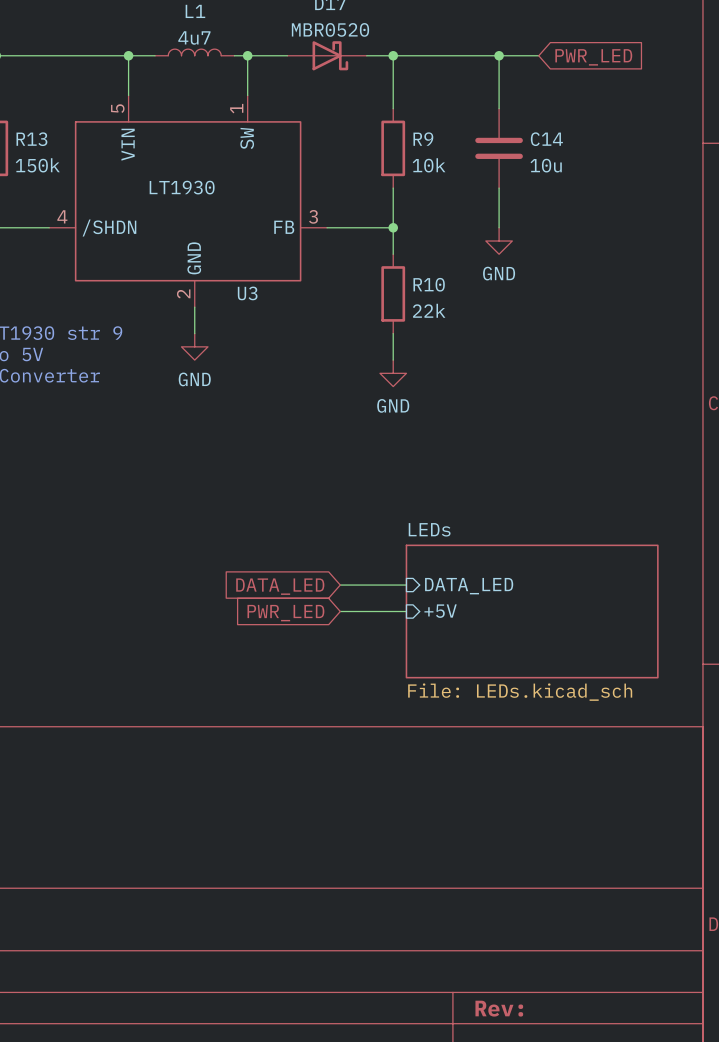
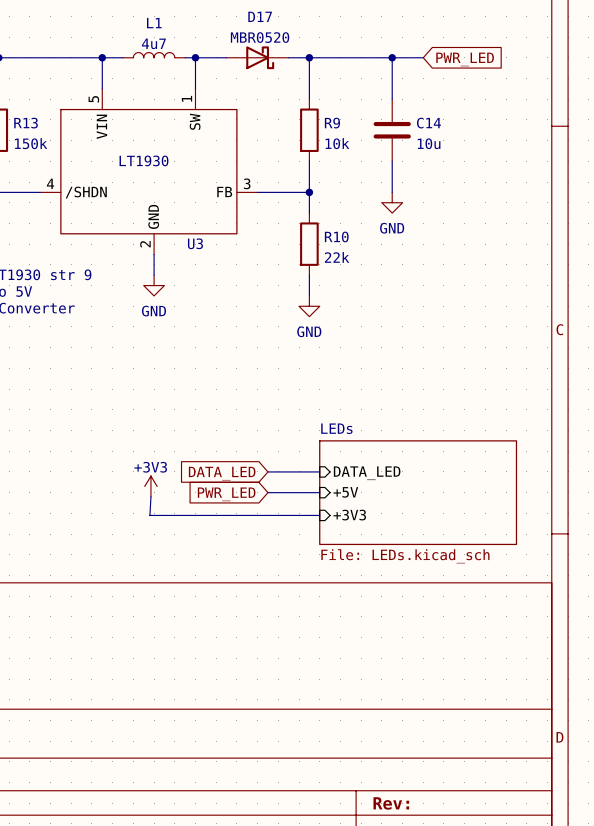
power symbol: none -> +3V3 (150, 486)
wire: none -> (150, 496) (149, 515) (319, 515)
sheet pin: none -> +3V3 (349, 515)

